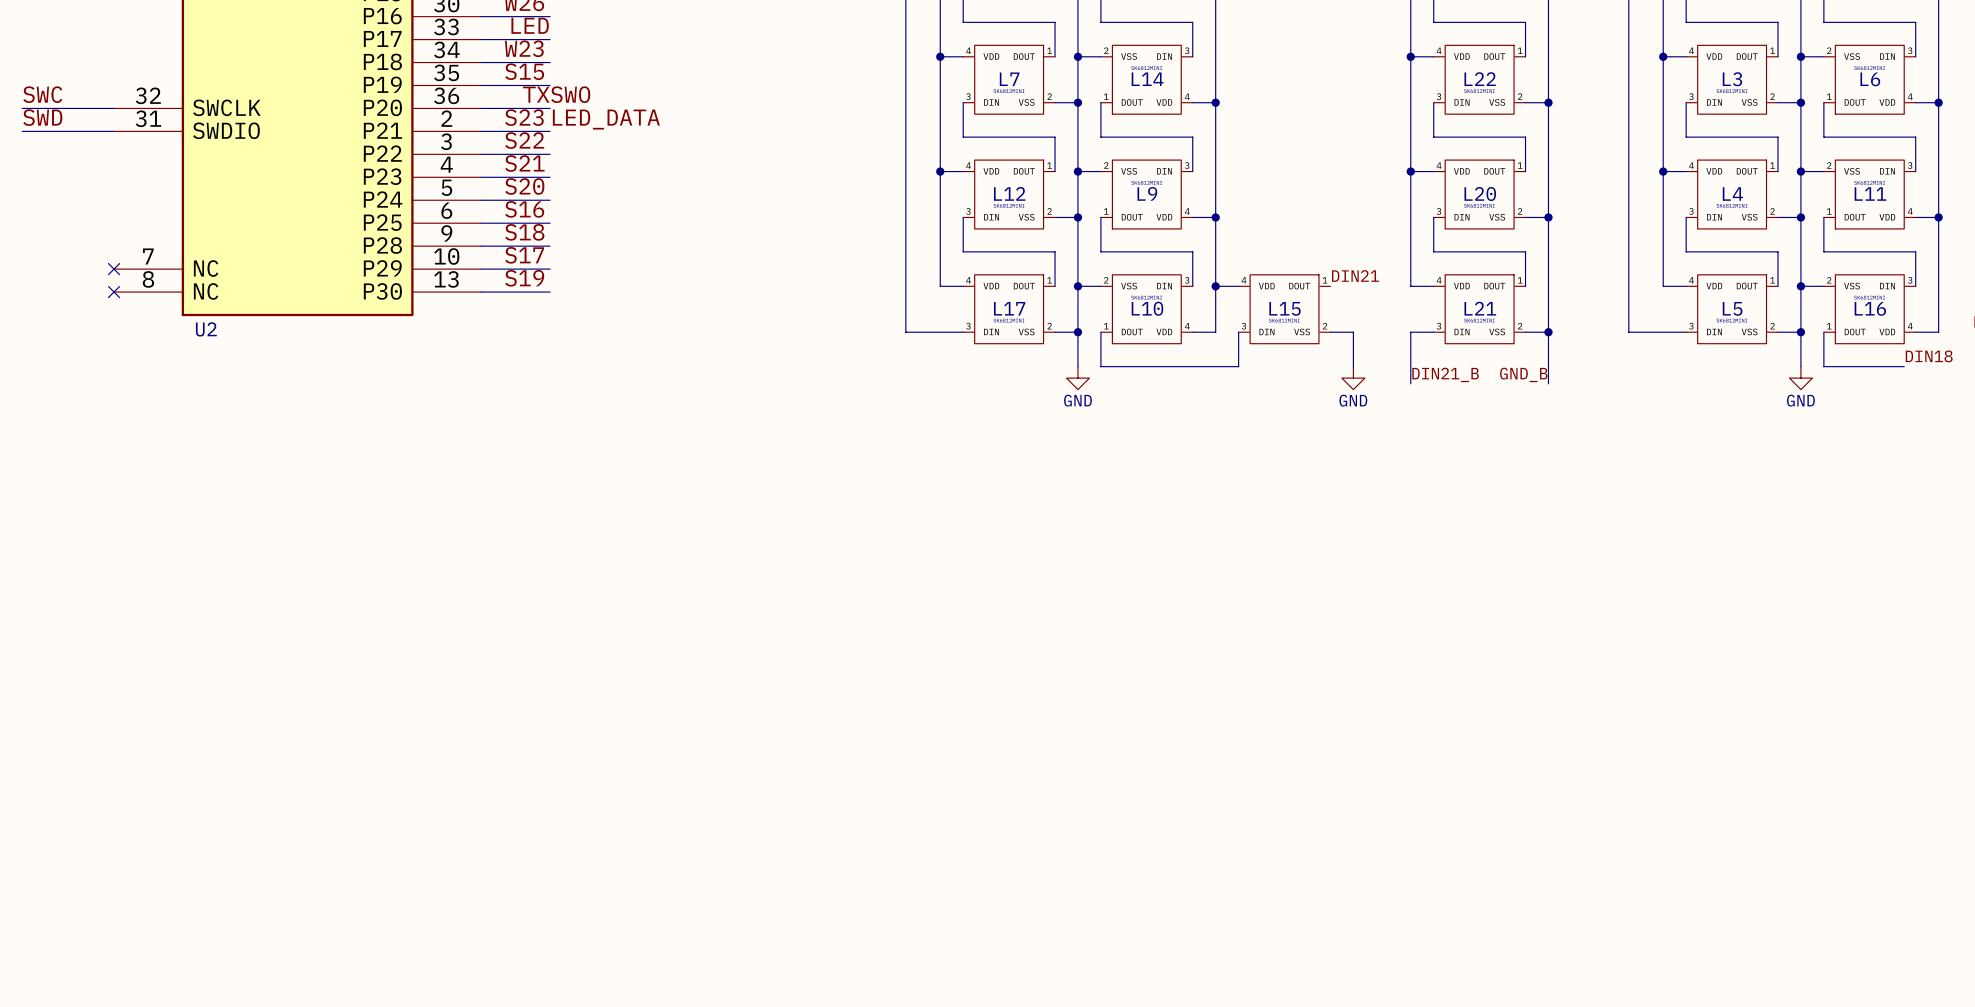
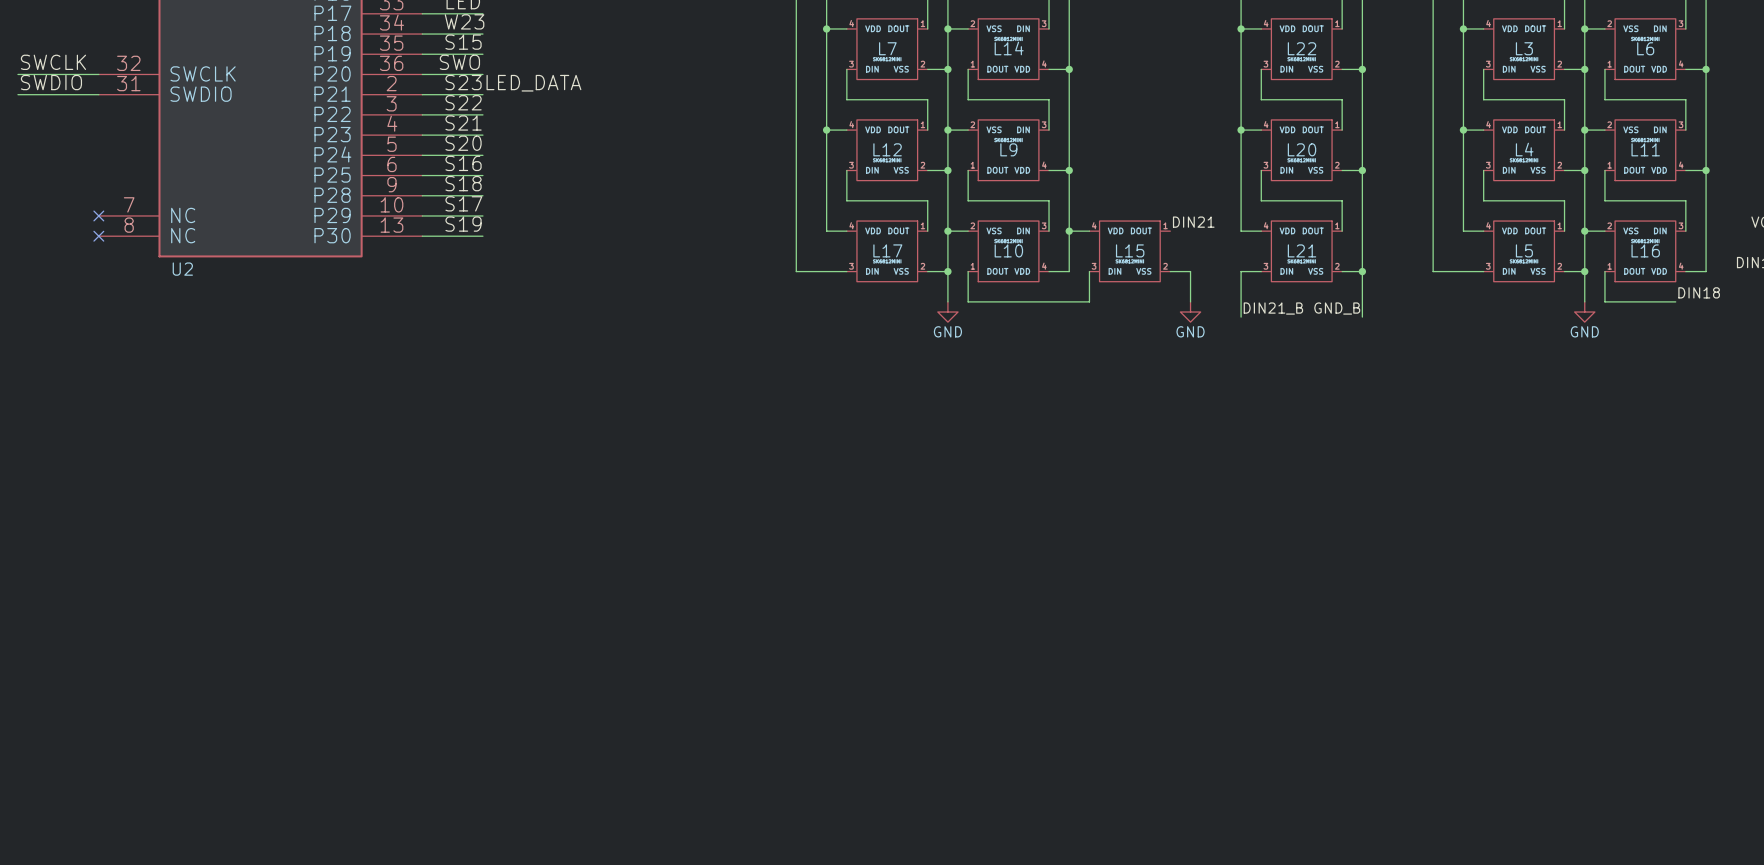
label: SWC (42, 94) -> SWCLK (53, 62)
label: TX (536, 94) -> none
label position: SWO (570, 94) -> SWO (459, 62)
label: SWD (42, 117) -> SWDIO (51, 82)

